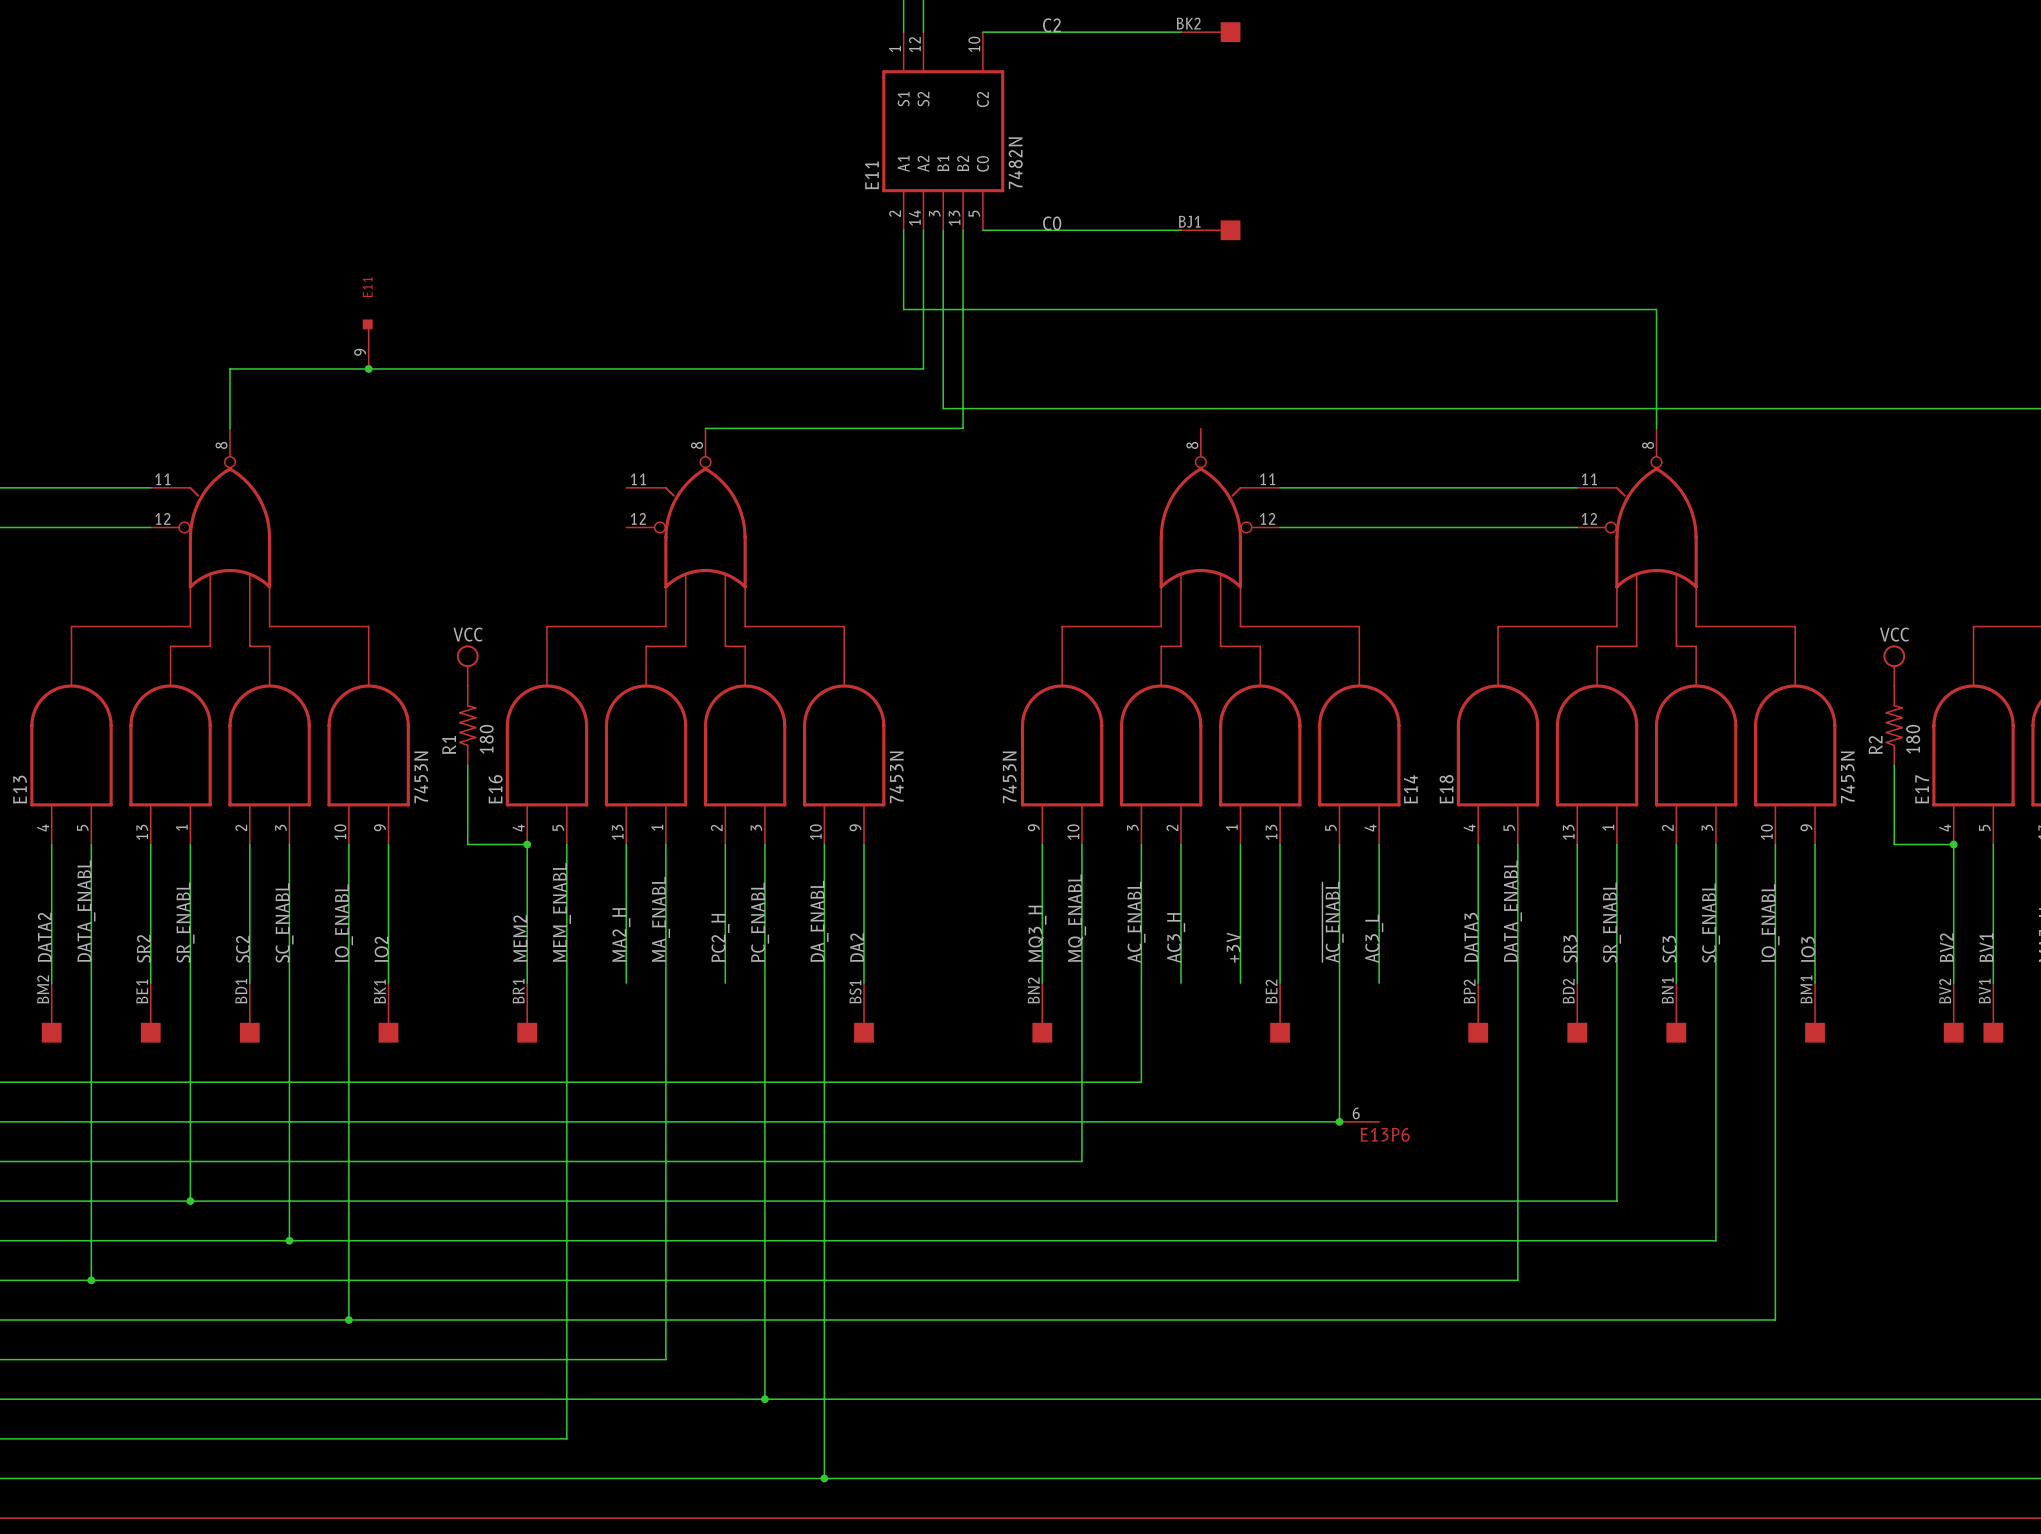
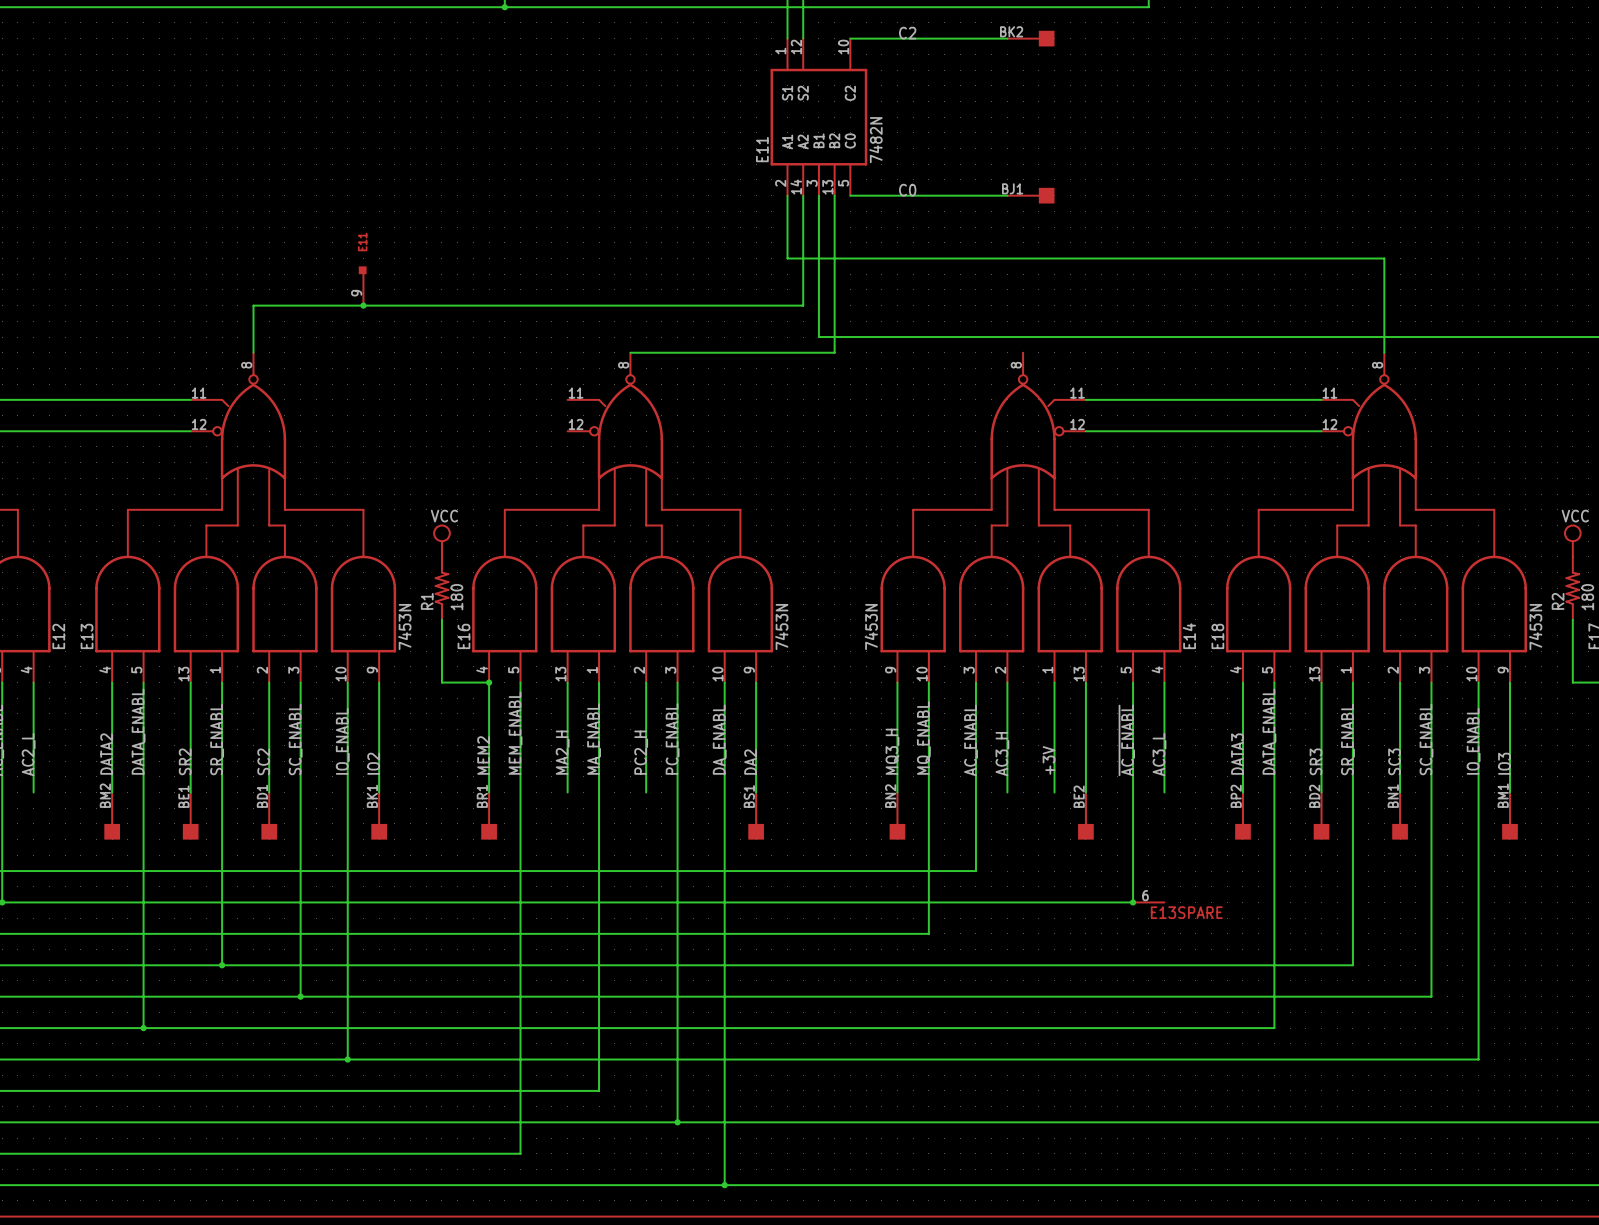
E13P6 name: E13P6 (1385, 1134) -> E13SPARE (1186, 912)

